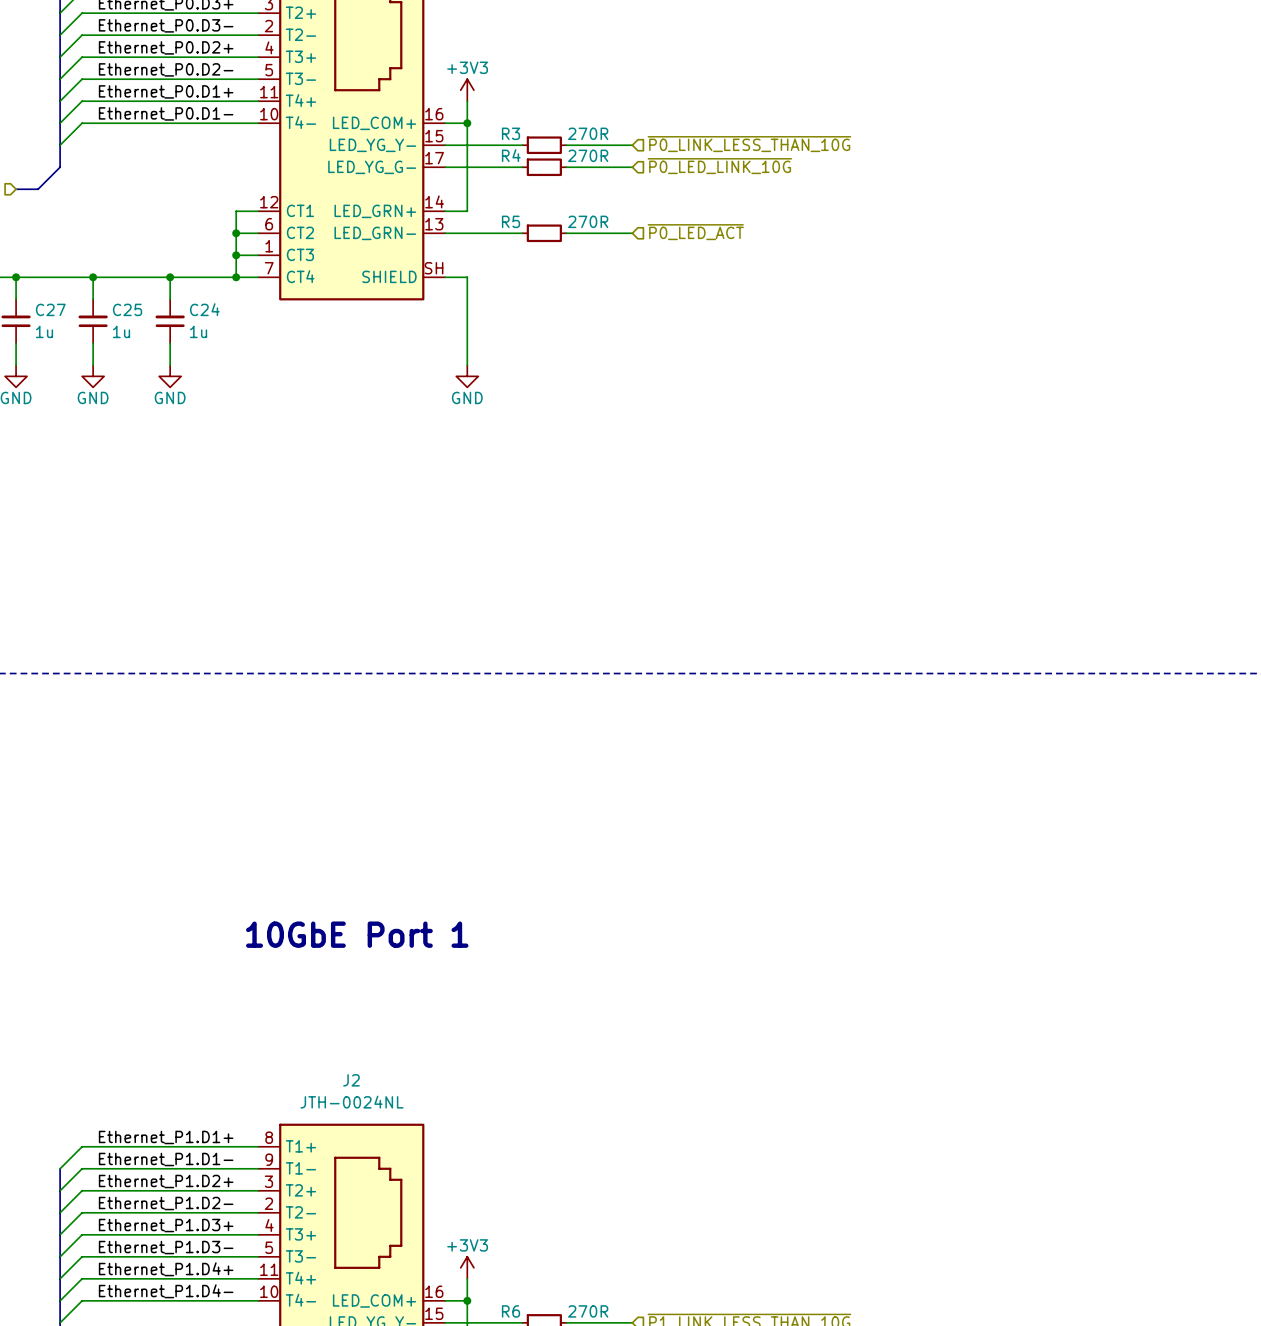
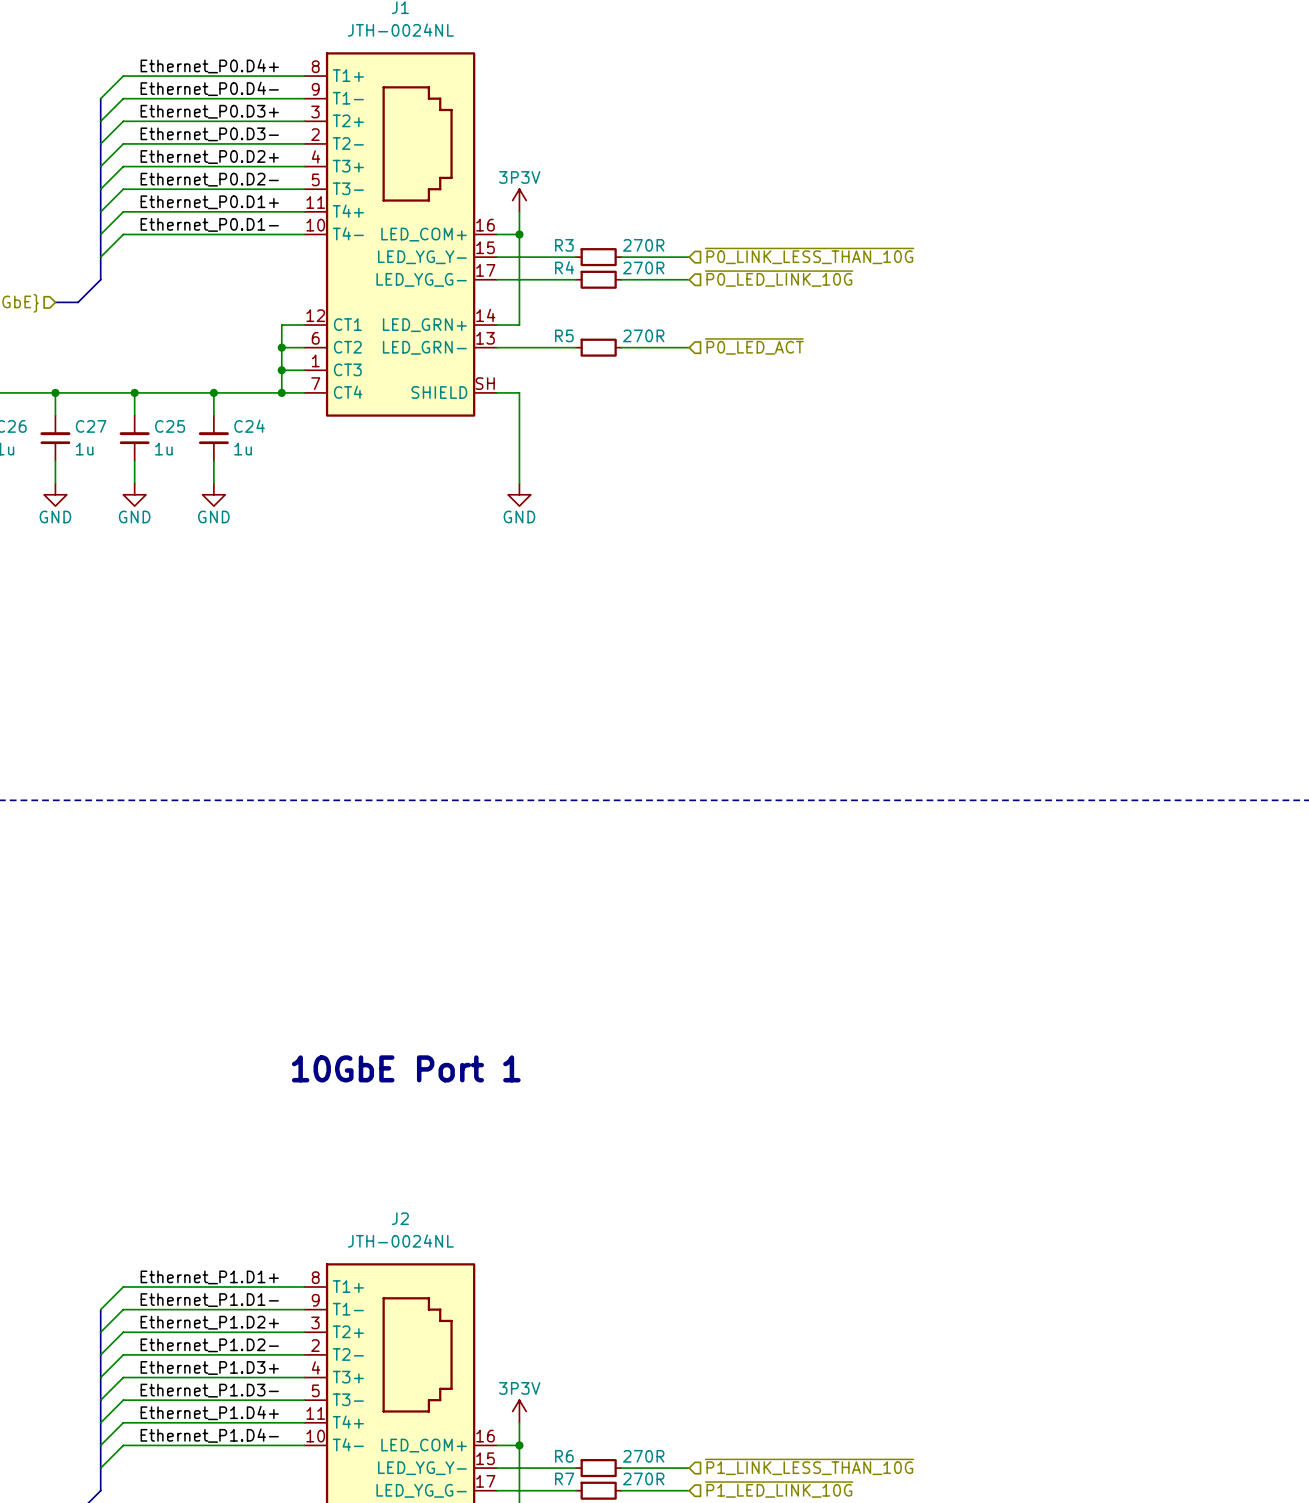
power symbol: +3V3 (467, 90) -> 3P3V (519, 200)
power symbol: +3V3 (467, 1267) -> 3P3V (519, 1411)

